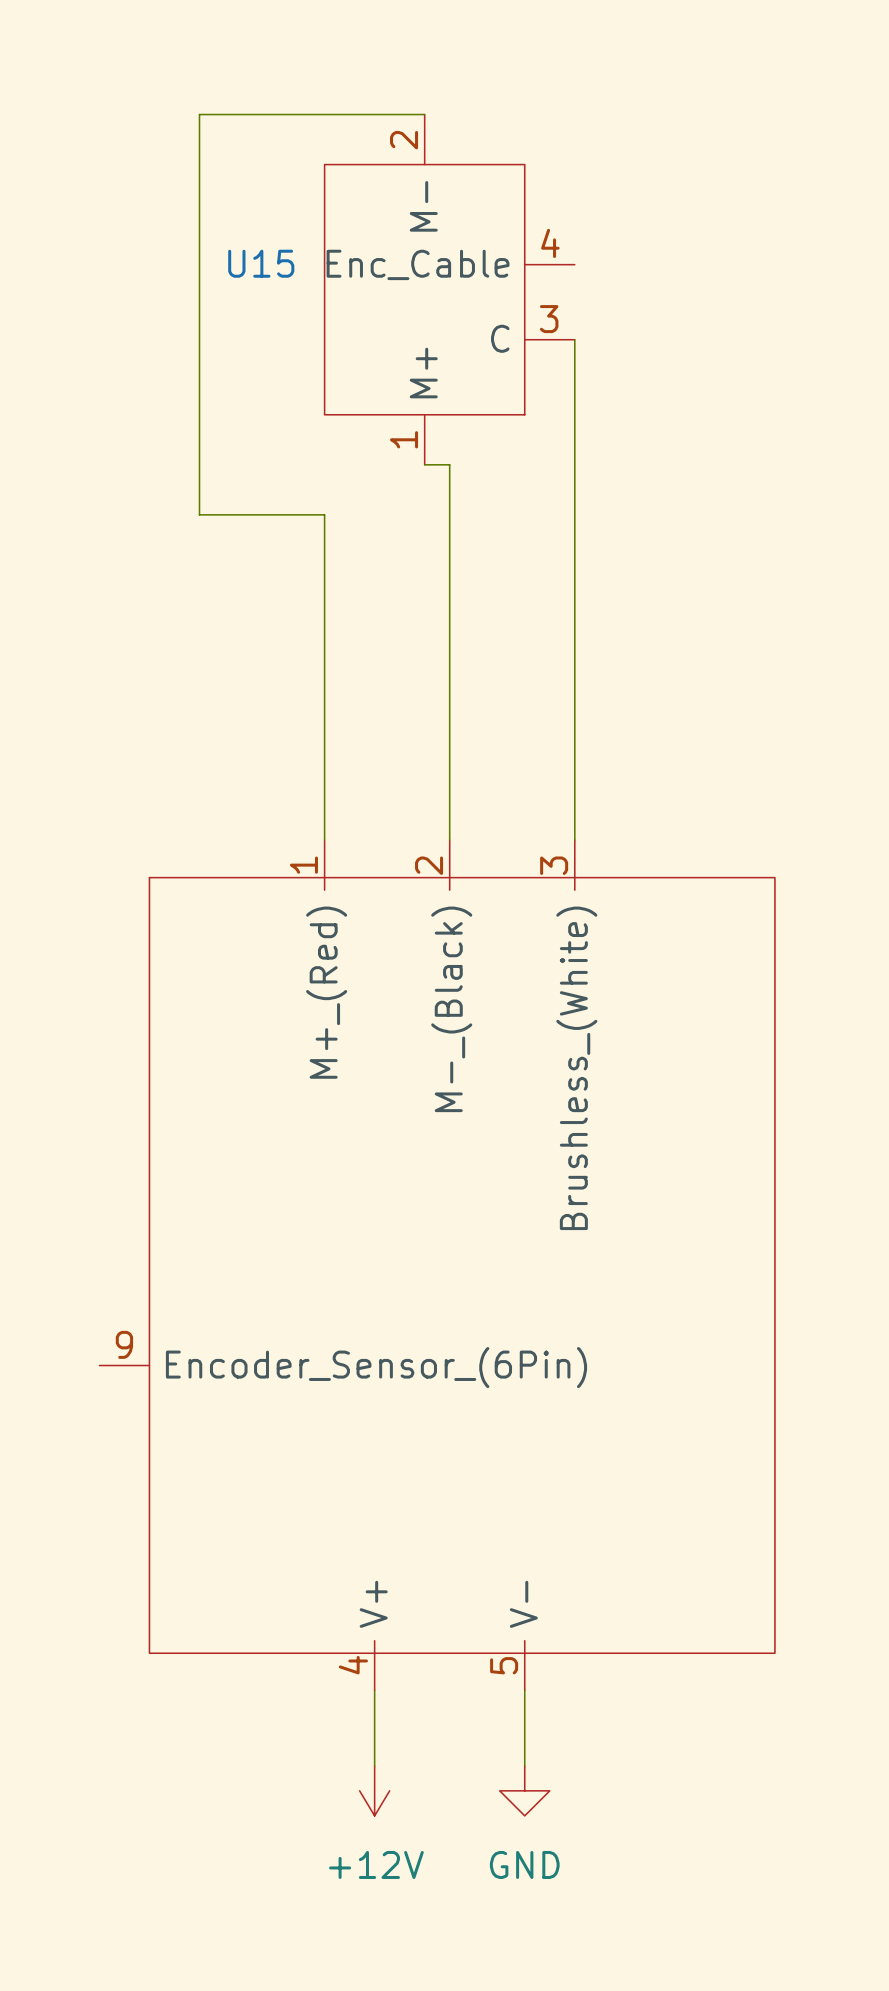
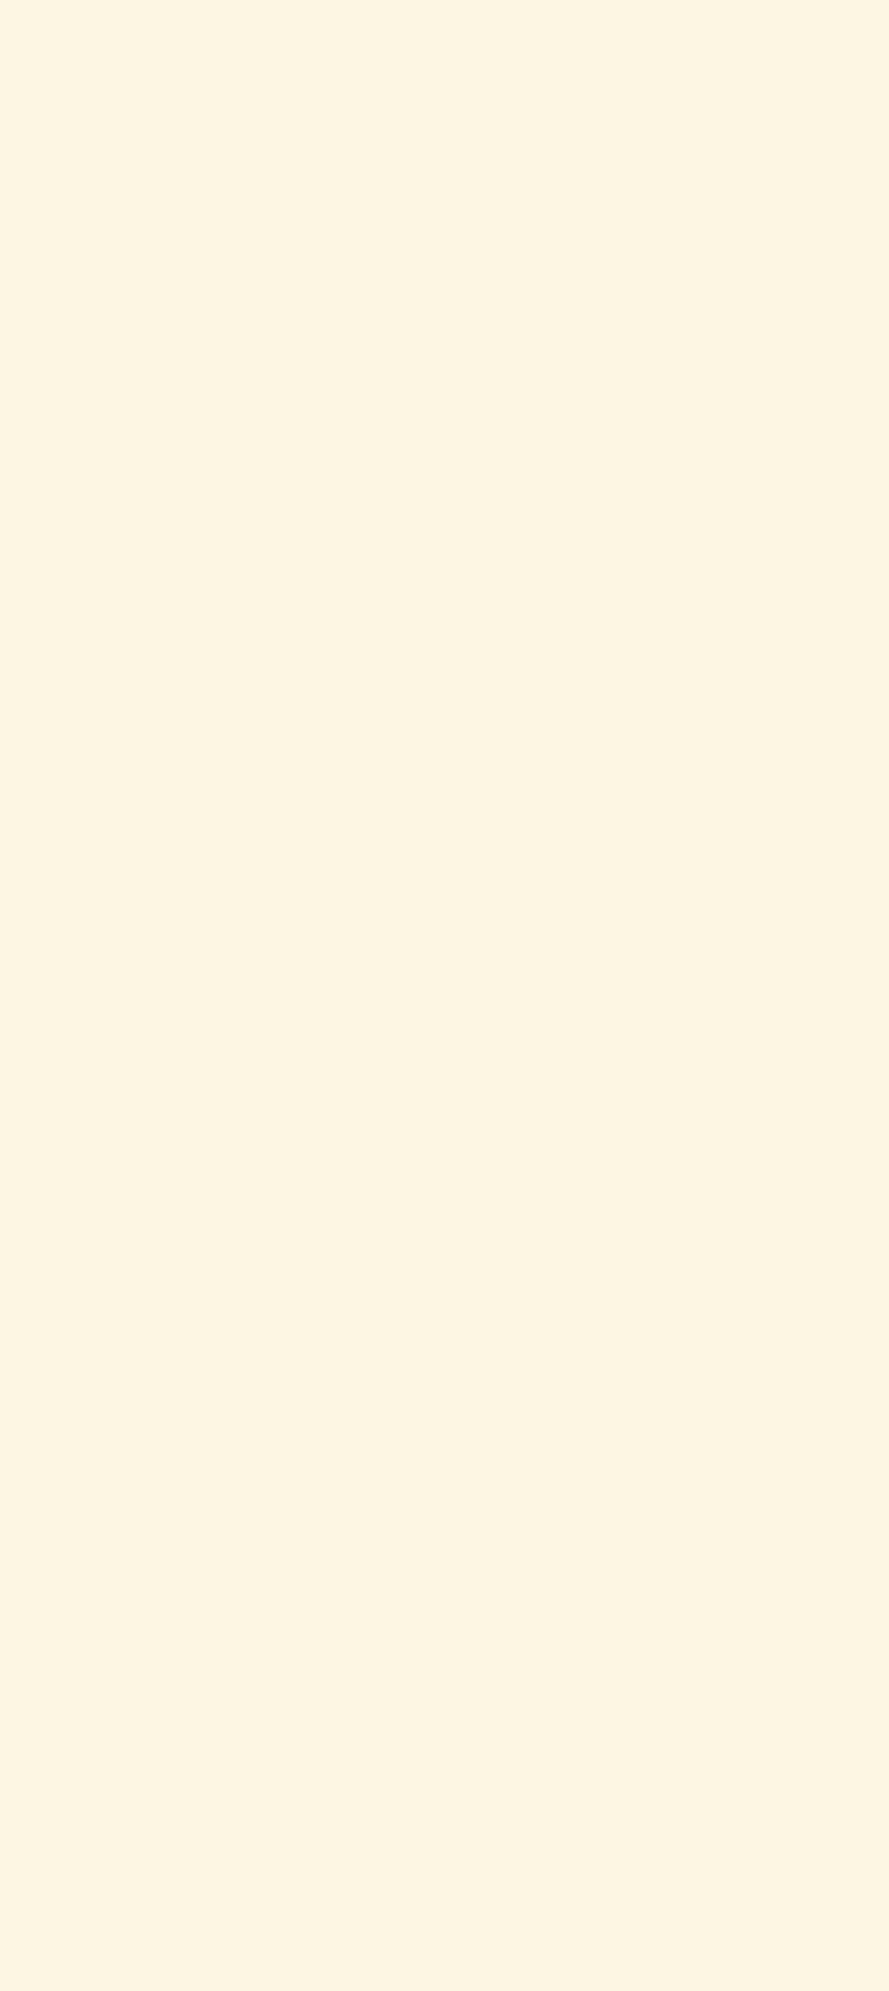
wire: (424, 114) (199, 114) (199, 514) (324, 514) (324, 840) -> none
U15: (449, 289) -> none
wire: (574, 339) (574, 840) -> none
wire: (424, 464) (449, 464) (449, 840) -> none
part: (437, 1265) -> none
wire: (374, 1690) (374, 1765) -> none
wire: (524, 1690) (524, 1765) -> none
power symbol: +12V (374, 1790) -> none
power symbol: GND (524, 1790) -> none

